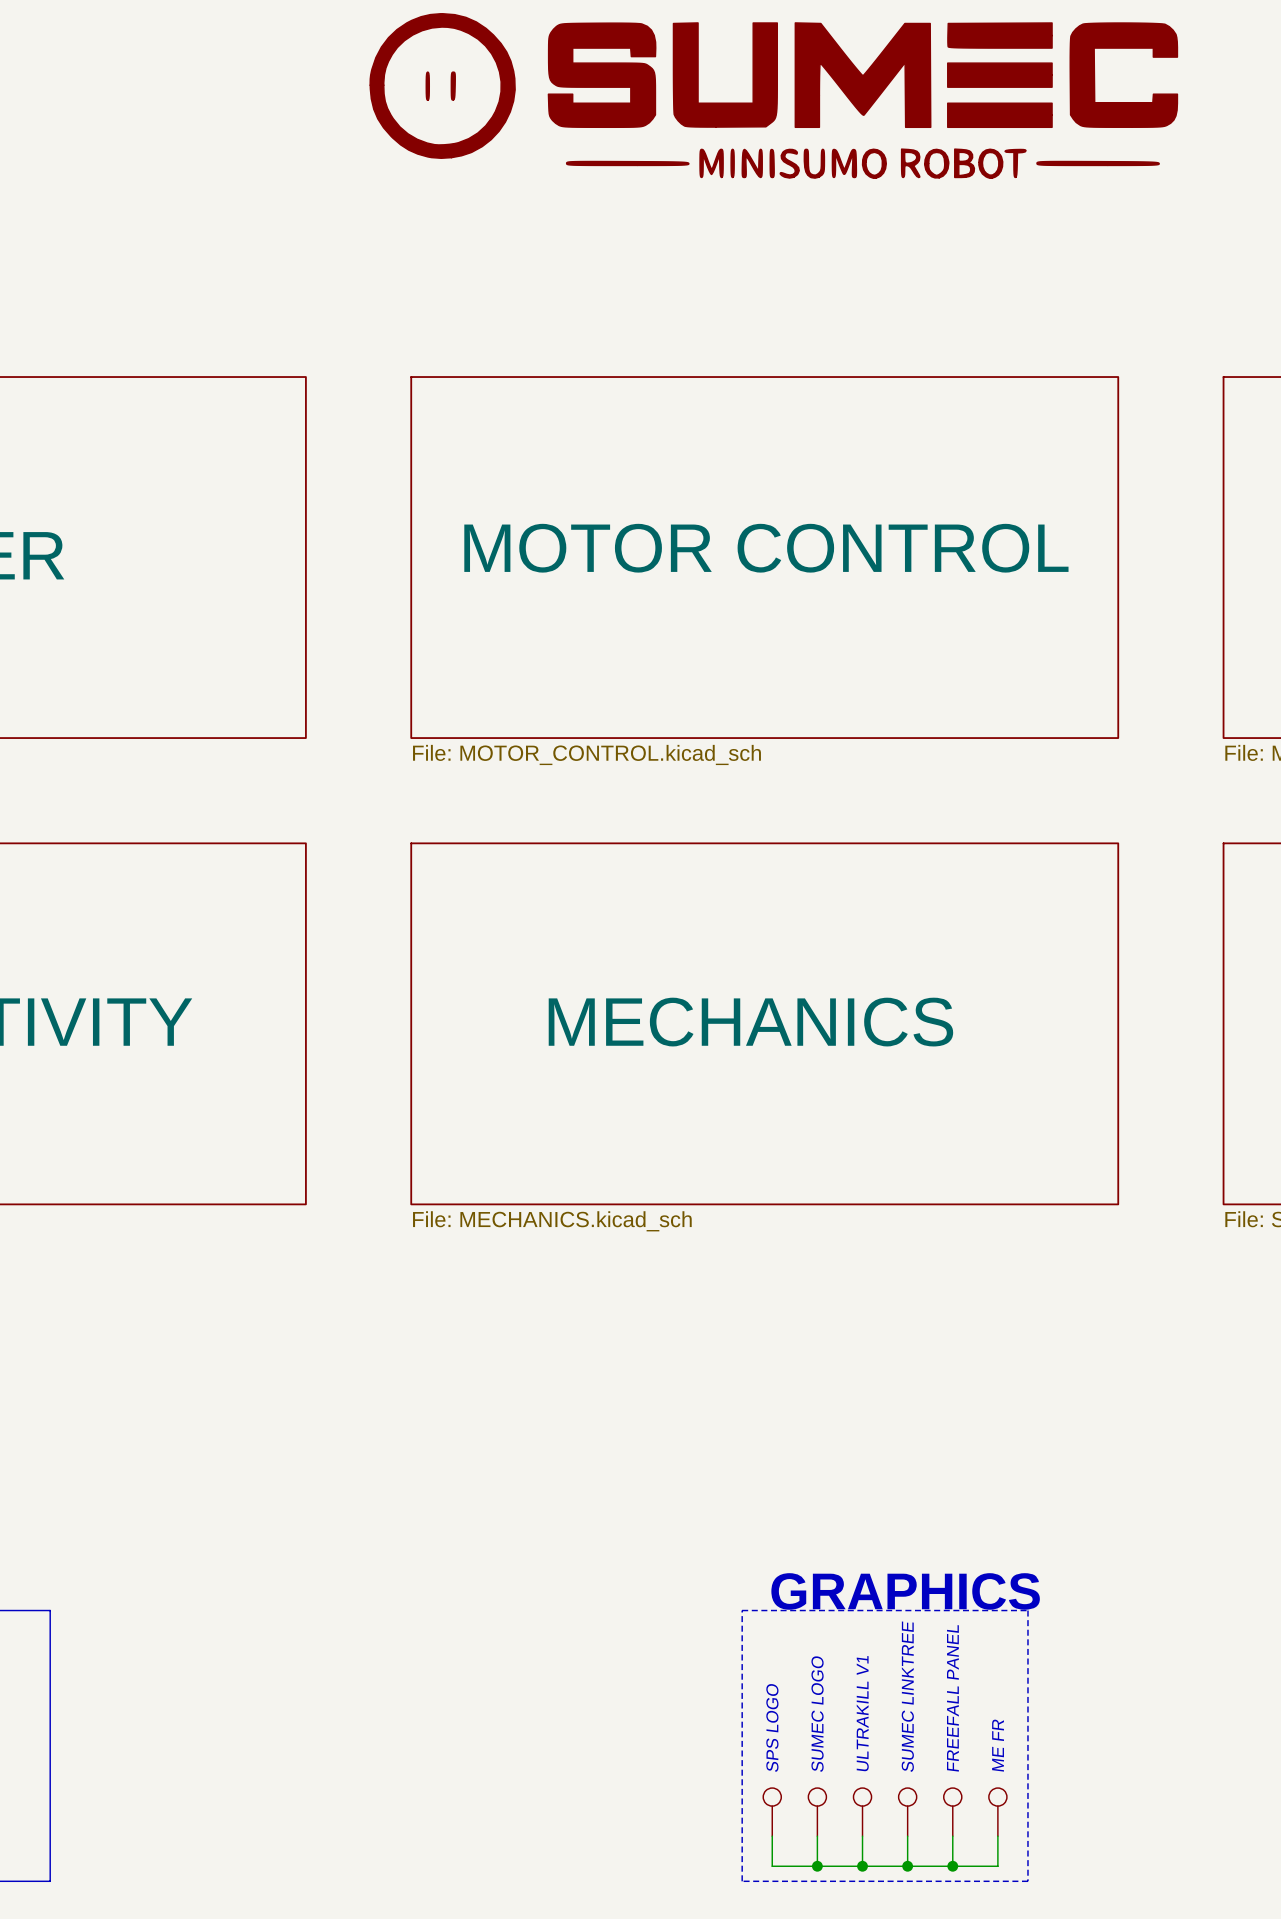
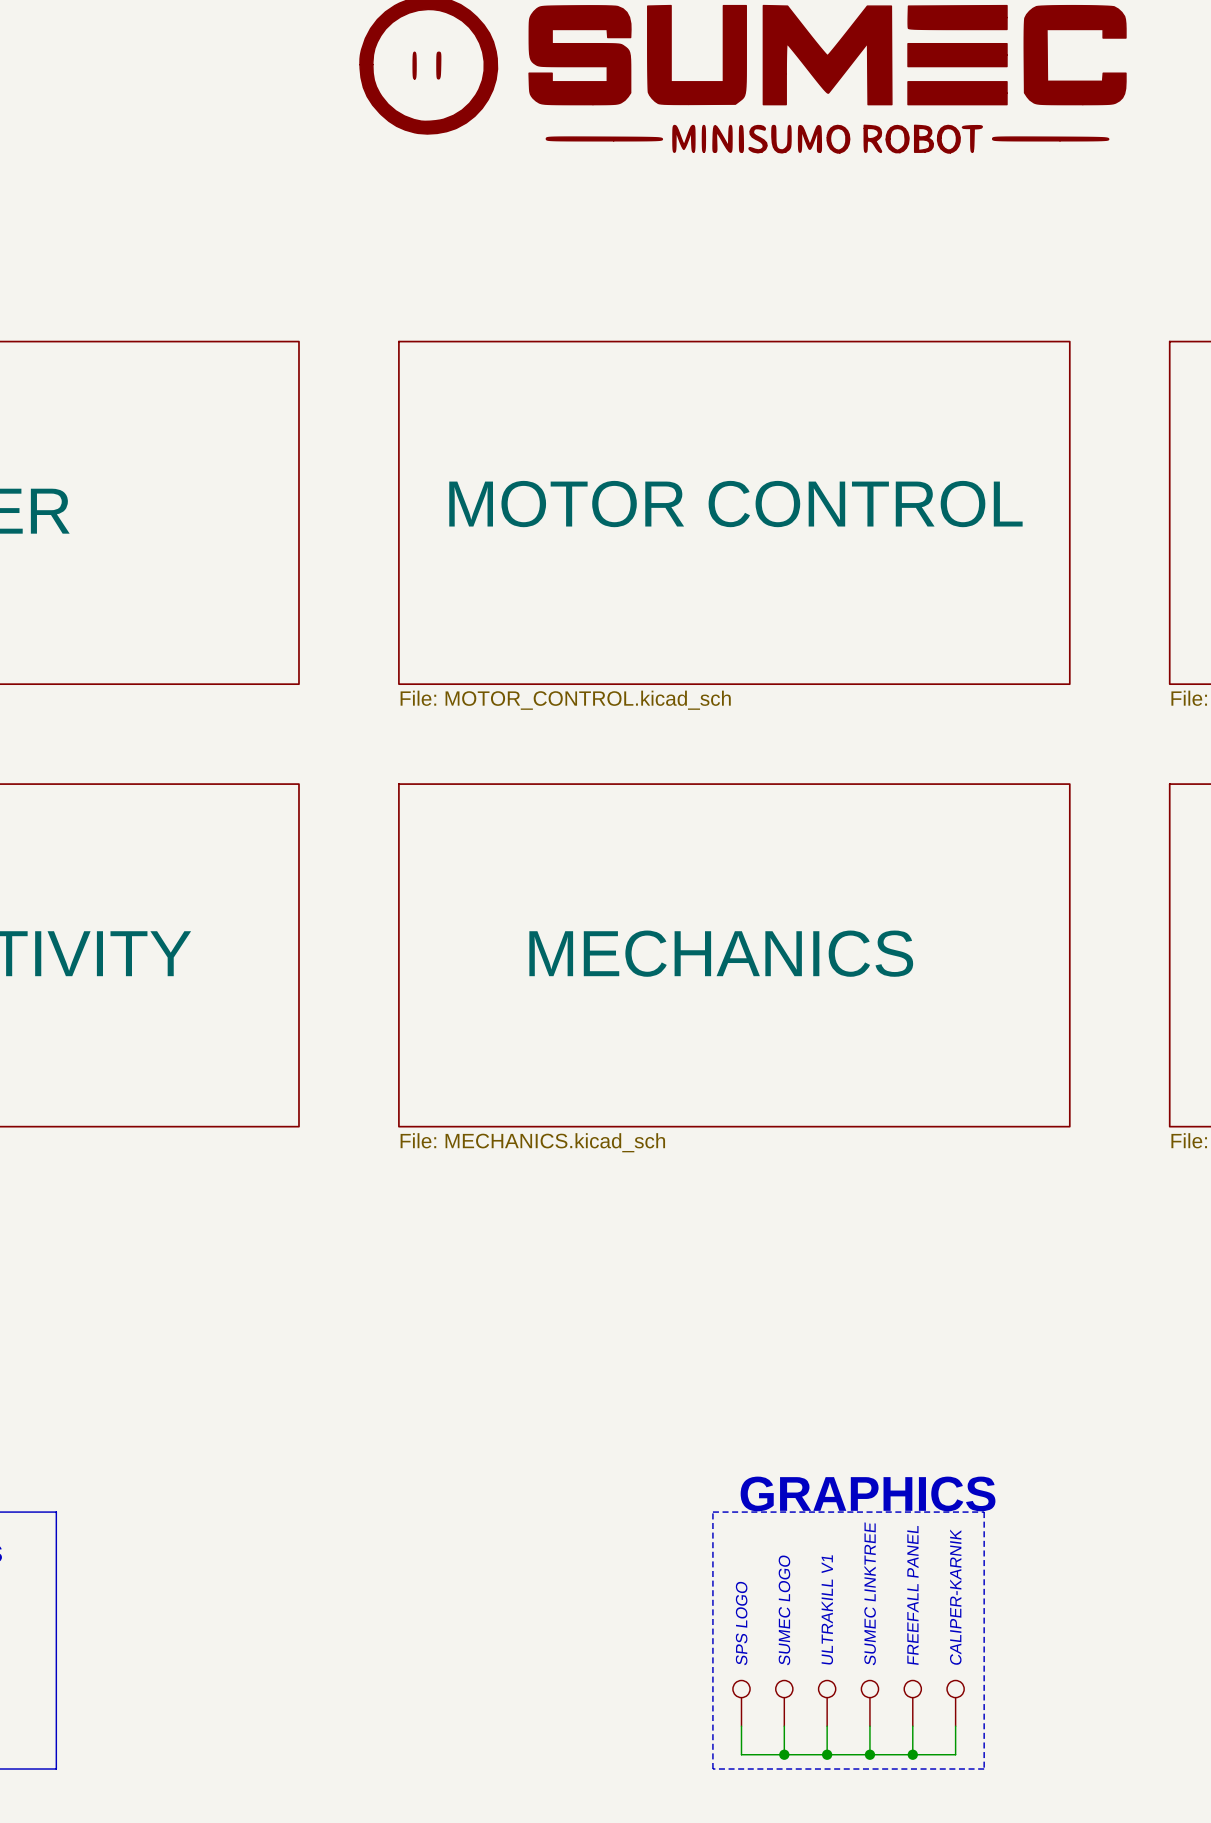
text: ME FR (998, 1745) -> CALIPER-KARNIK (955, 1597)

